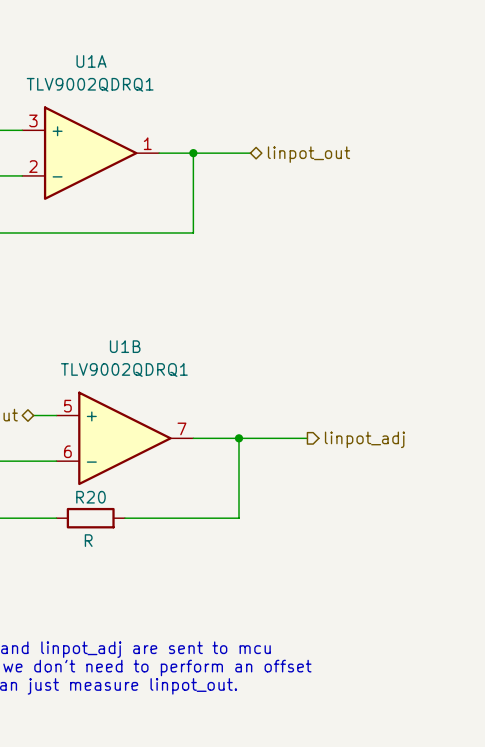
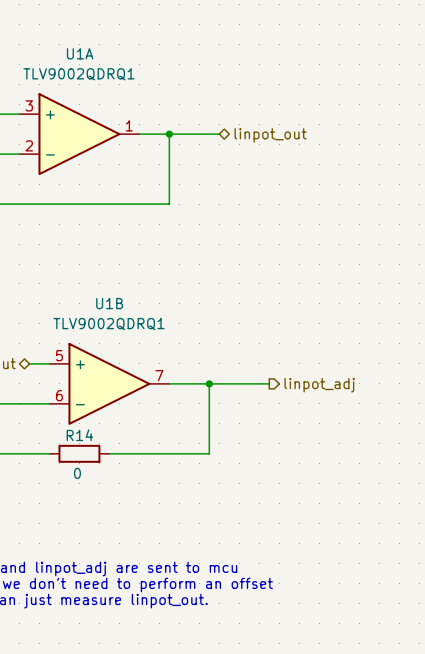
R20 name: R20 (90, 497) -> R14 (79, 435)
R20 value: R (88, 540) -> 0 (77, 473)

